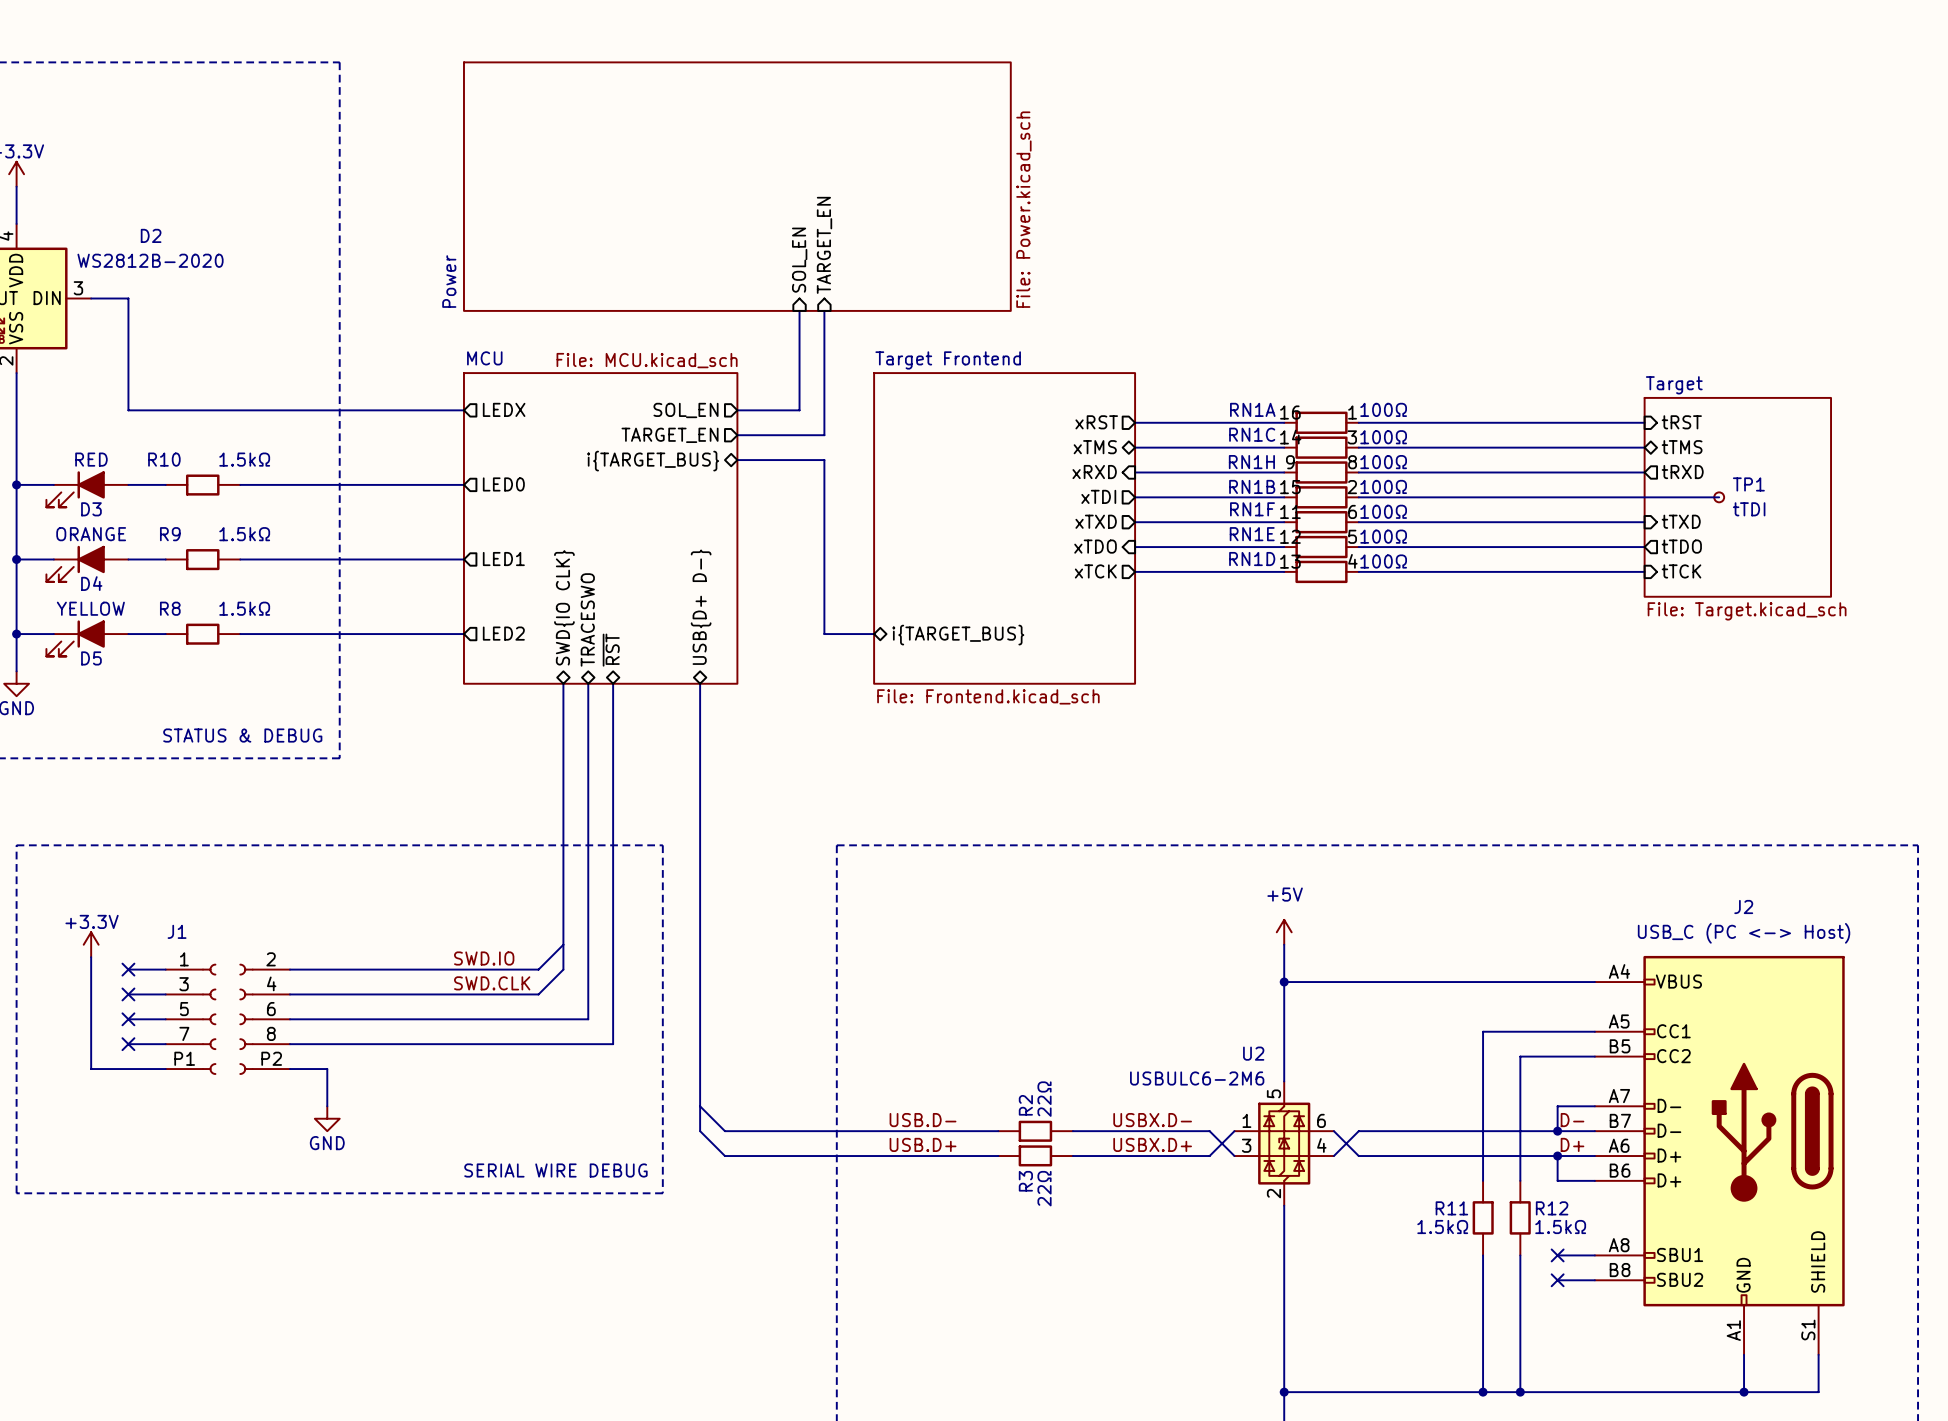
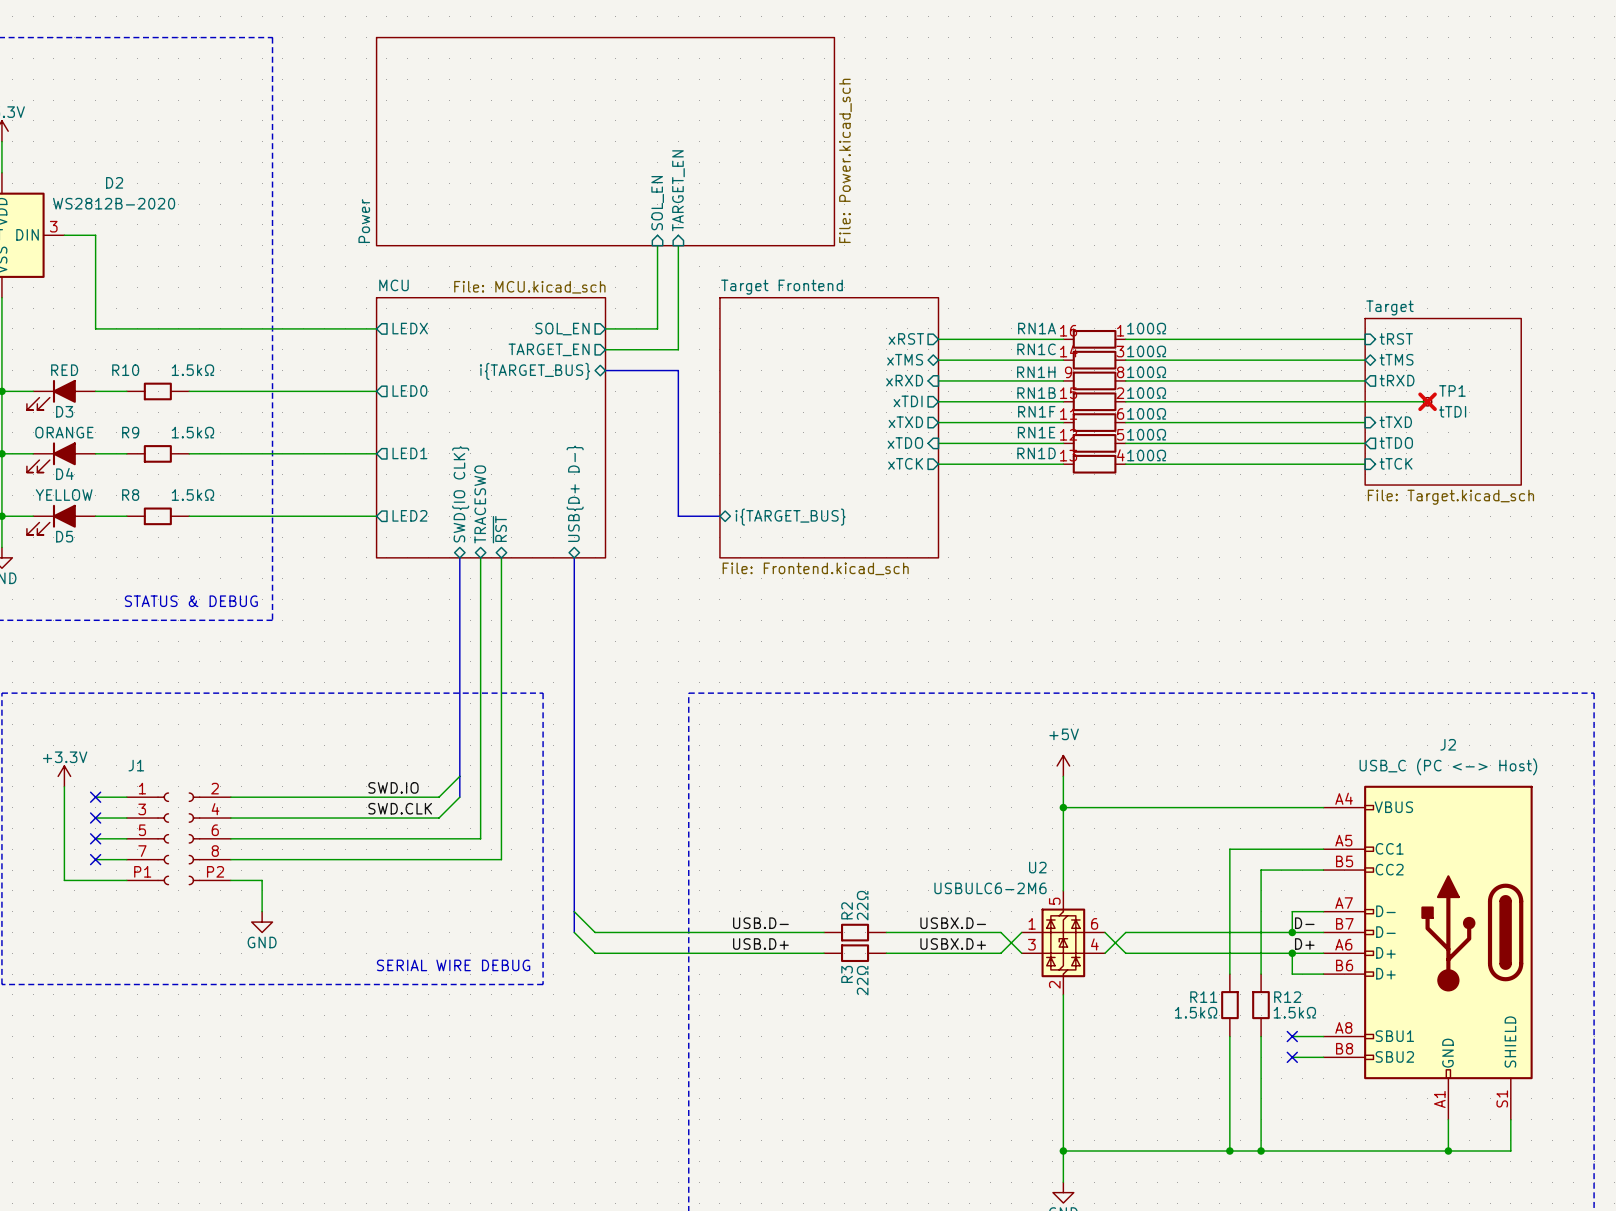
TP1 do-not-place cross: none -> (1427, 401)

